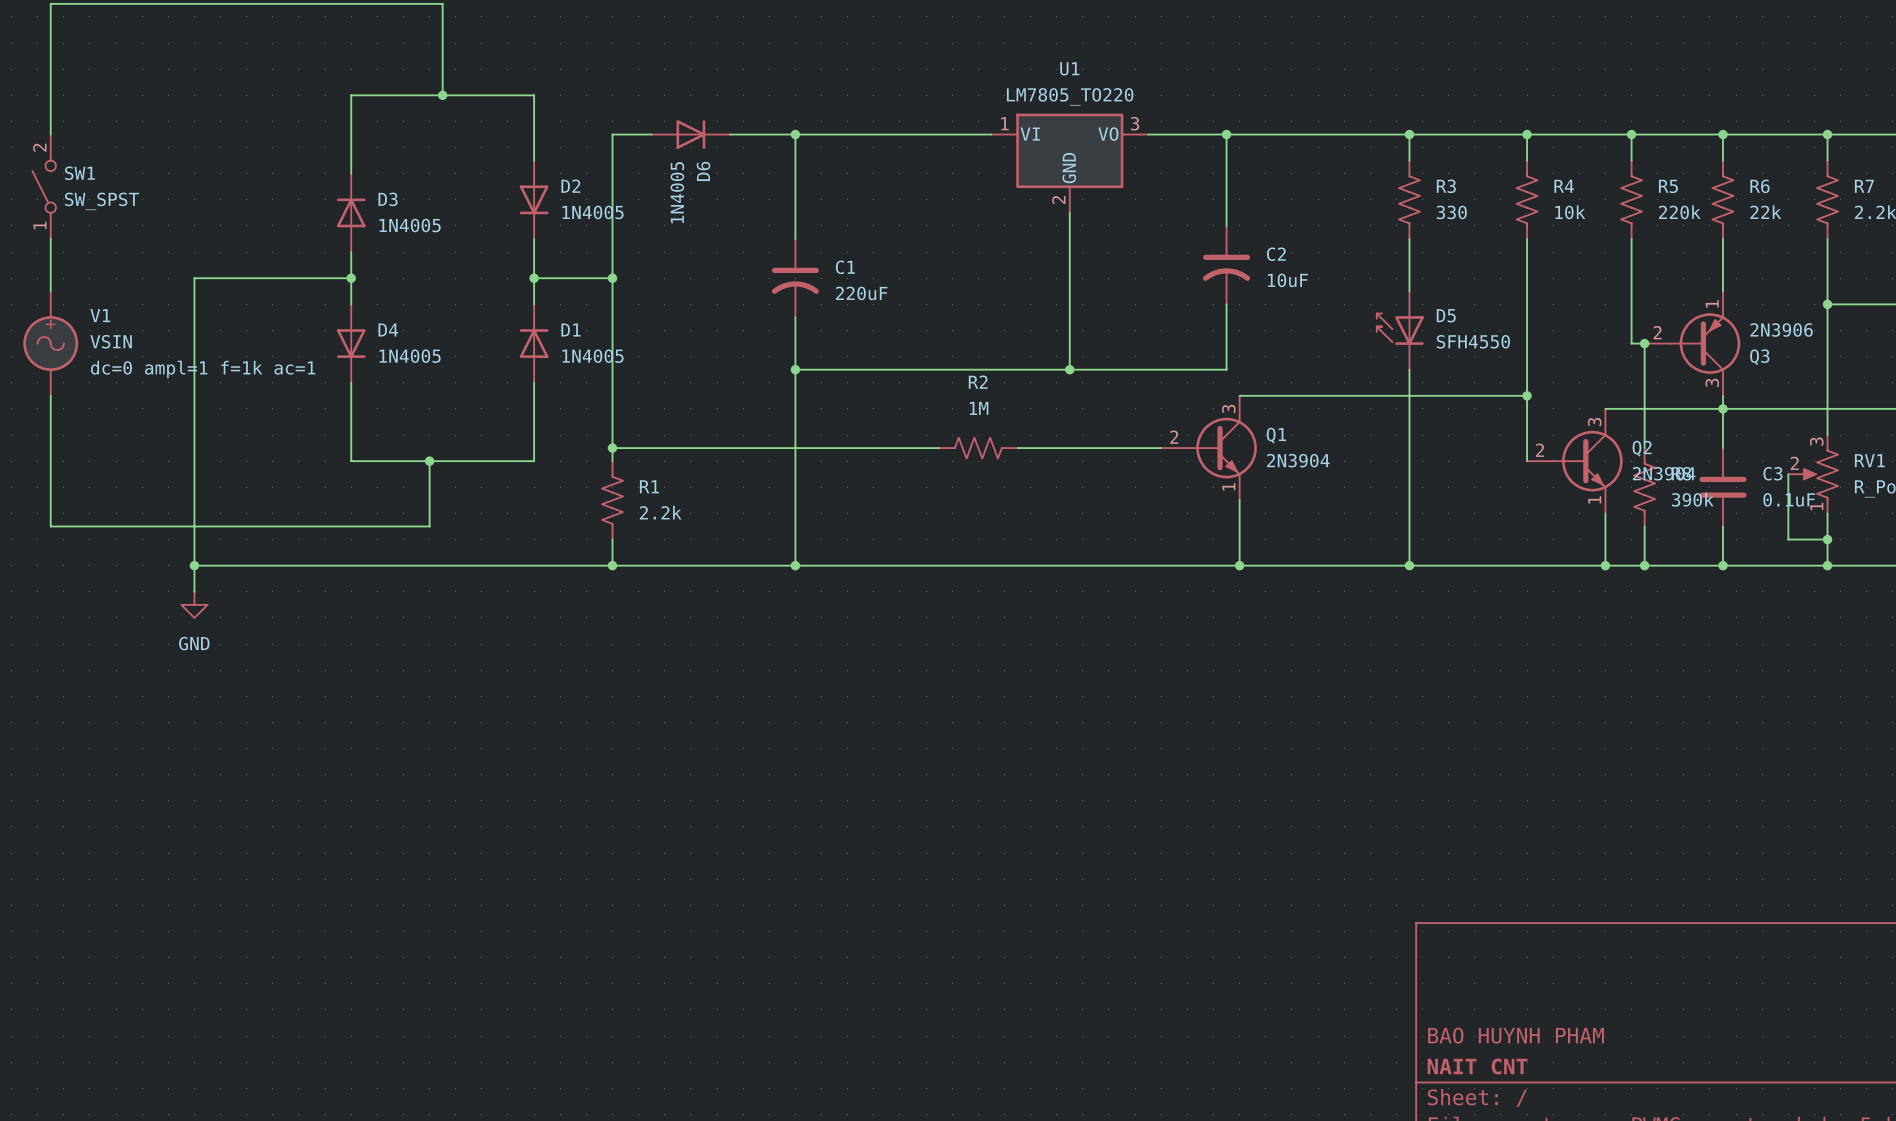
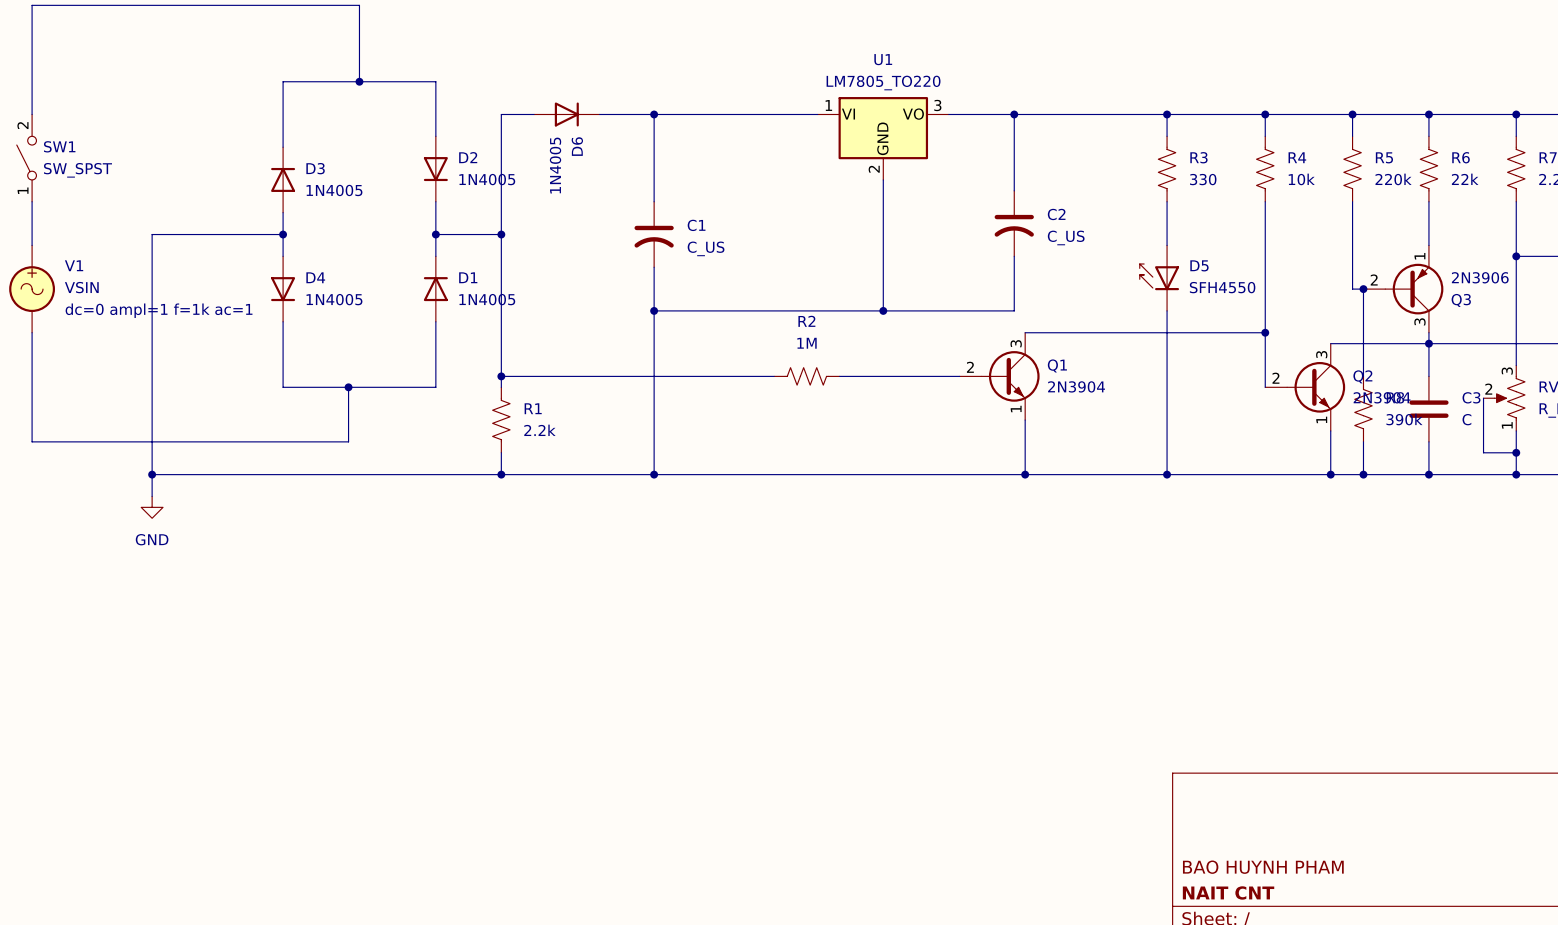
C2 value: 10uF (1287, 280) -> C_US (1066, 237)
C1 value: 220uF (861, 293) -> C_US (706, 248)
C3 value: 0.1uF (1789, 499) -> C (1466, 419)

